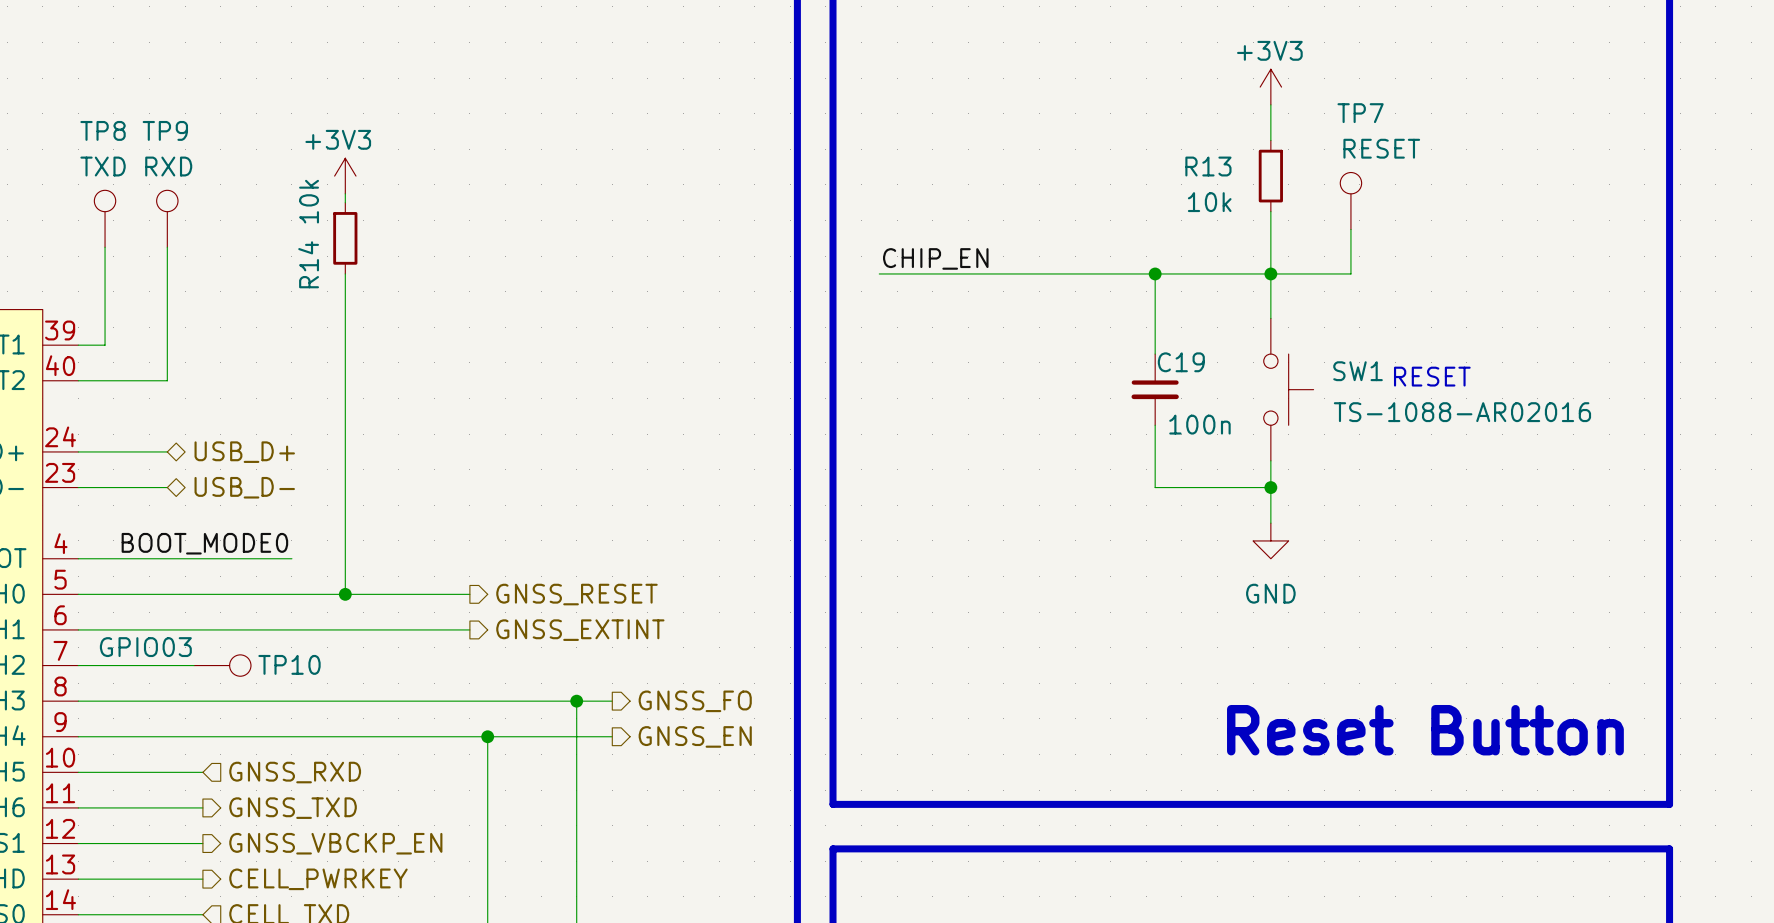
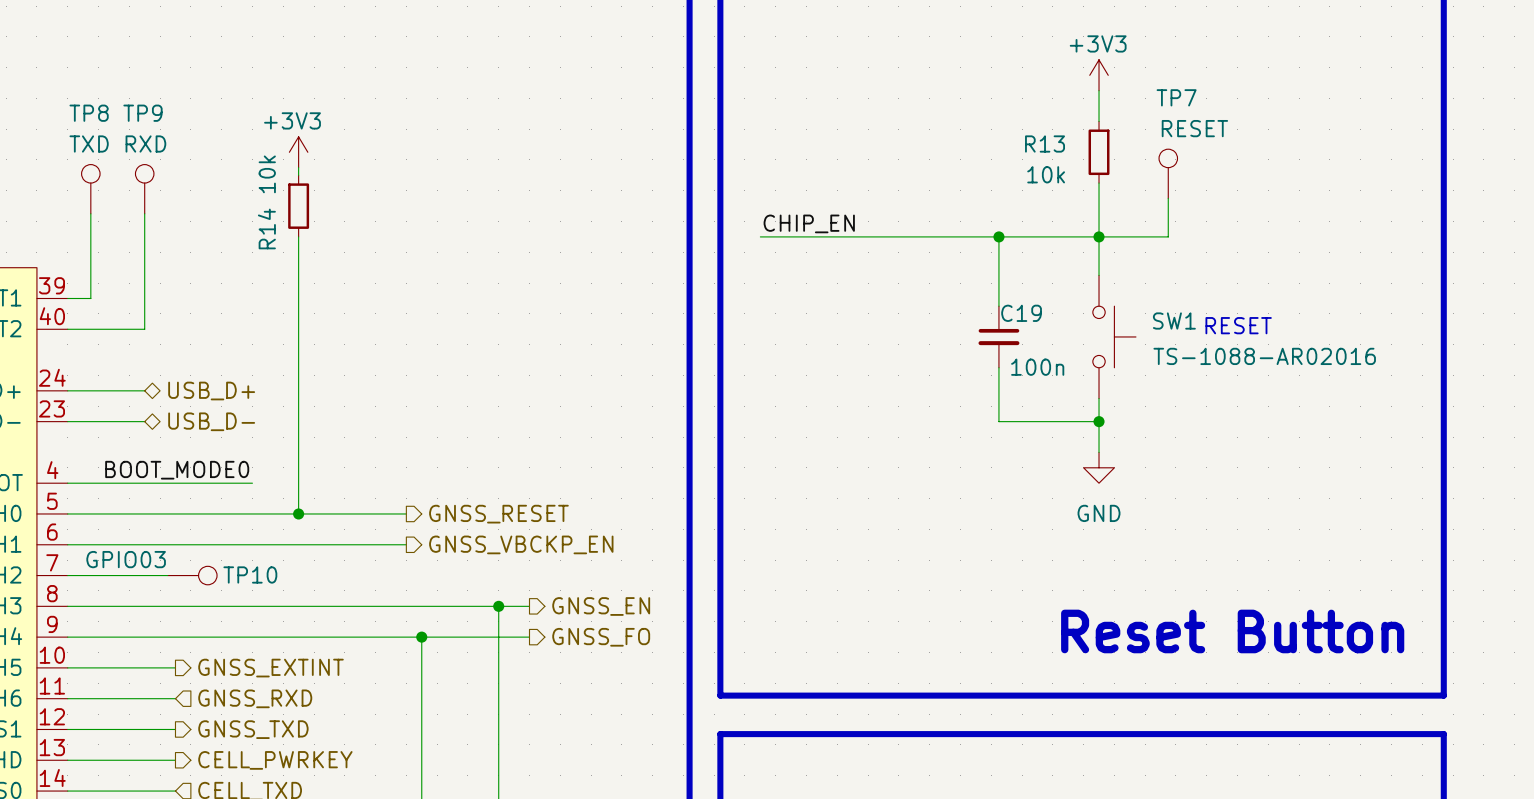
hierarchical label: GNSS_EXTINT (580, 630) -> GNSS_VBCKP_EN (521, 544)
hierarchical label: GNSS_FO (695, 701) -> GNSS_EN (601, 606)
hierarchical label: GNSS_EN (695, 736) -> GNSS_FO (601, 637)
hierarchical label shape: input (295, 772) -> output (271, 668)
hierarchical label: GNSS_RXD (295, 772) -> GNSS_EXTINT (271, 668)
hierarchical label shape: output (293, 808) -> input (255, 698)
hierarchical label: GNSS_TXD (293, 808) -> GNSS_RXD (255, 698)
hierarchical label: GNSS_VBCKP_EN (335, 843) -> GNSS_TXD (253, 729)

